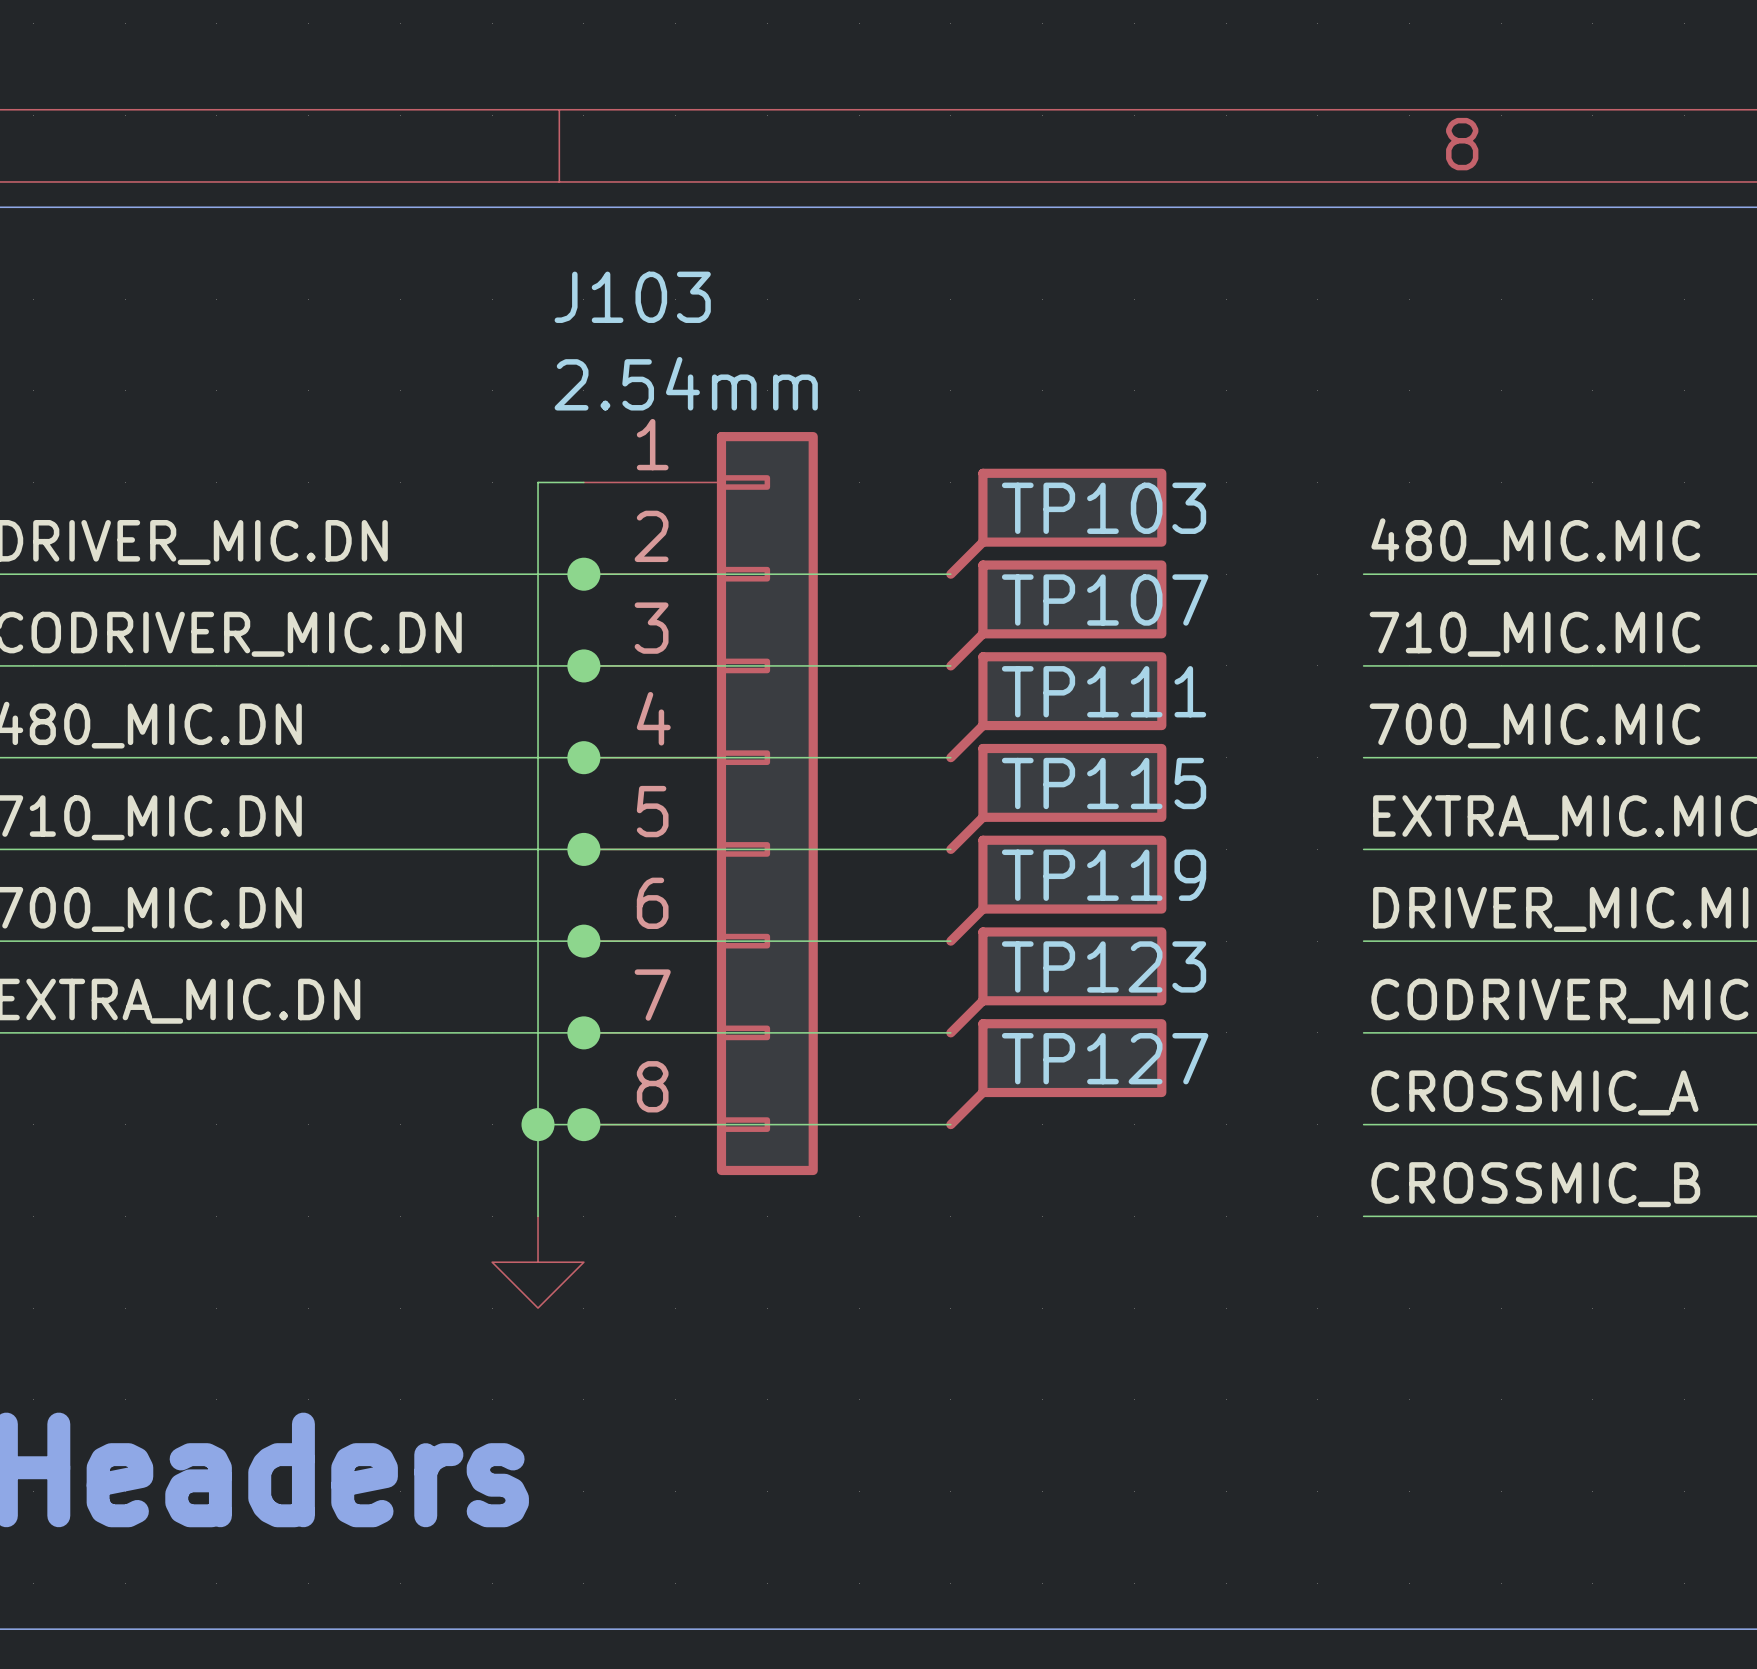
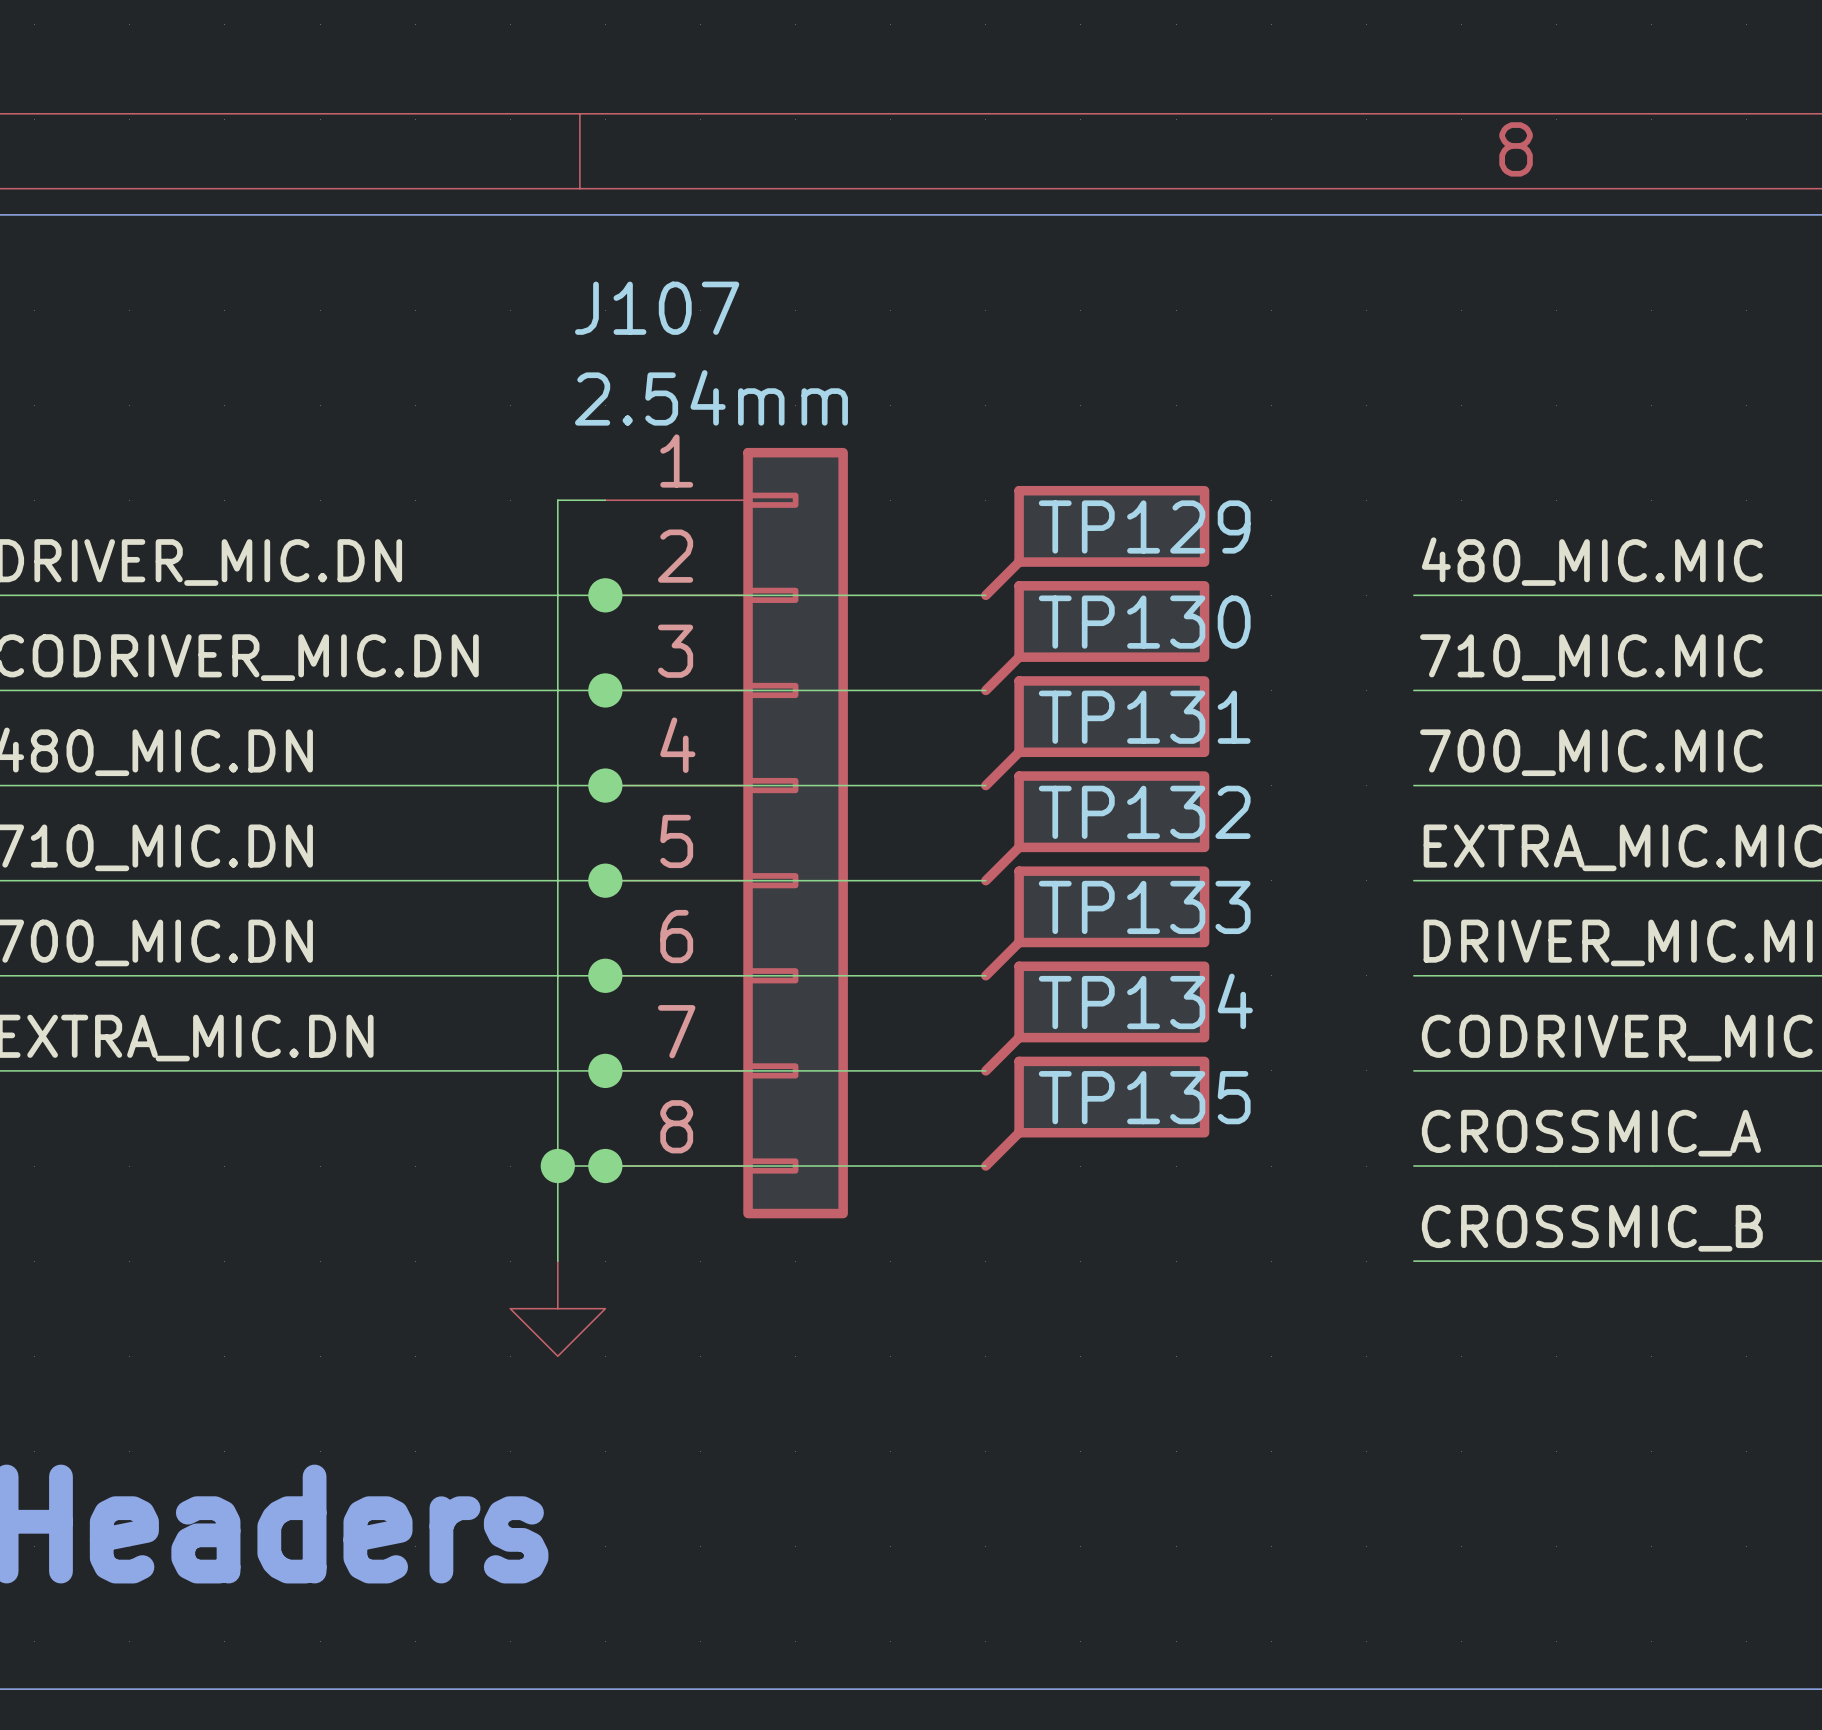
J103 name: J103 (632, 297) -> J107 (657, 308)
TP103 name: TP103 (1104, 508) -> TP129 (1144, 526)
TP107 name: TP107 (1105, 600) -> TP130 (1144, 622)
TP111 name: TP111 (1104, 691) -> TP131 (1144, 717)
TP115 name: TP115 (1104, 783) -> TP132 (1144, 812)
TP119 name: TP119 (1104, 875) -> TP133 (1144, 907)
TP123 name: TP123 (1104, 966) -> TP134 (1145, 1001)
TP127 name: TP127 (1105, 1058) -> TP135 (1144, 1097)

